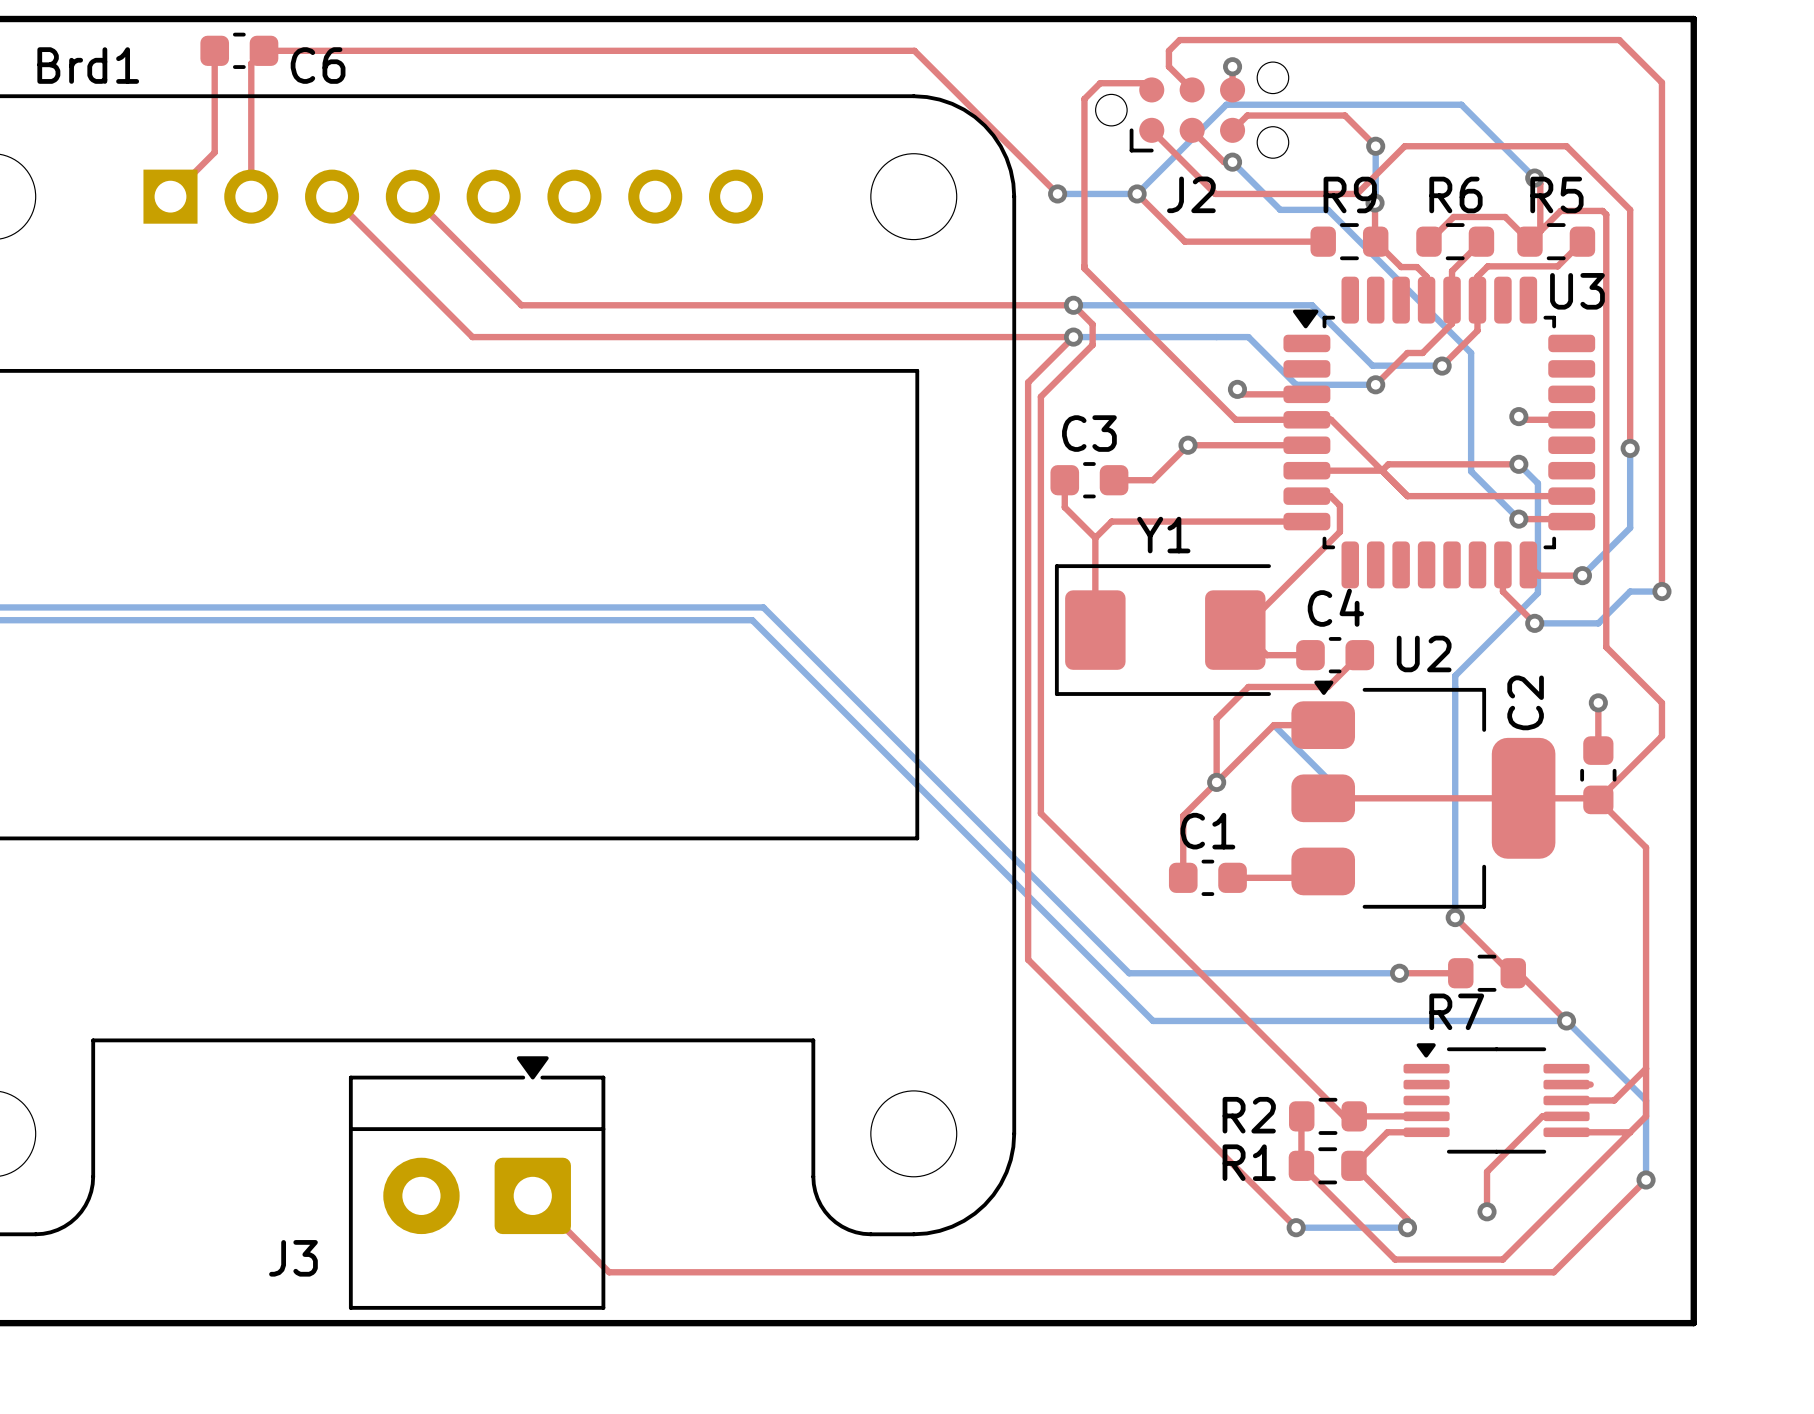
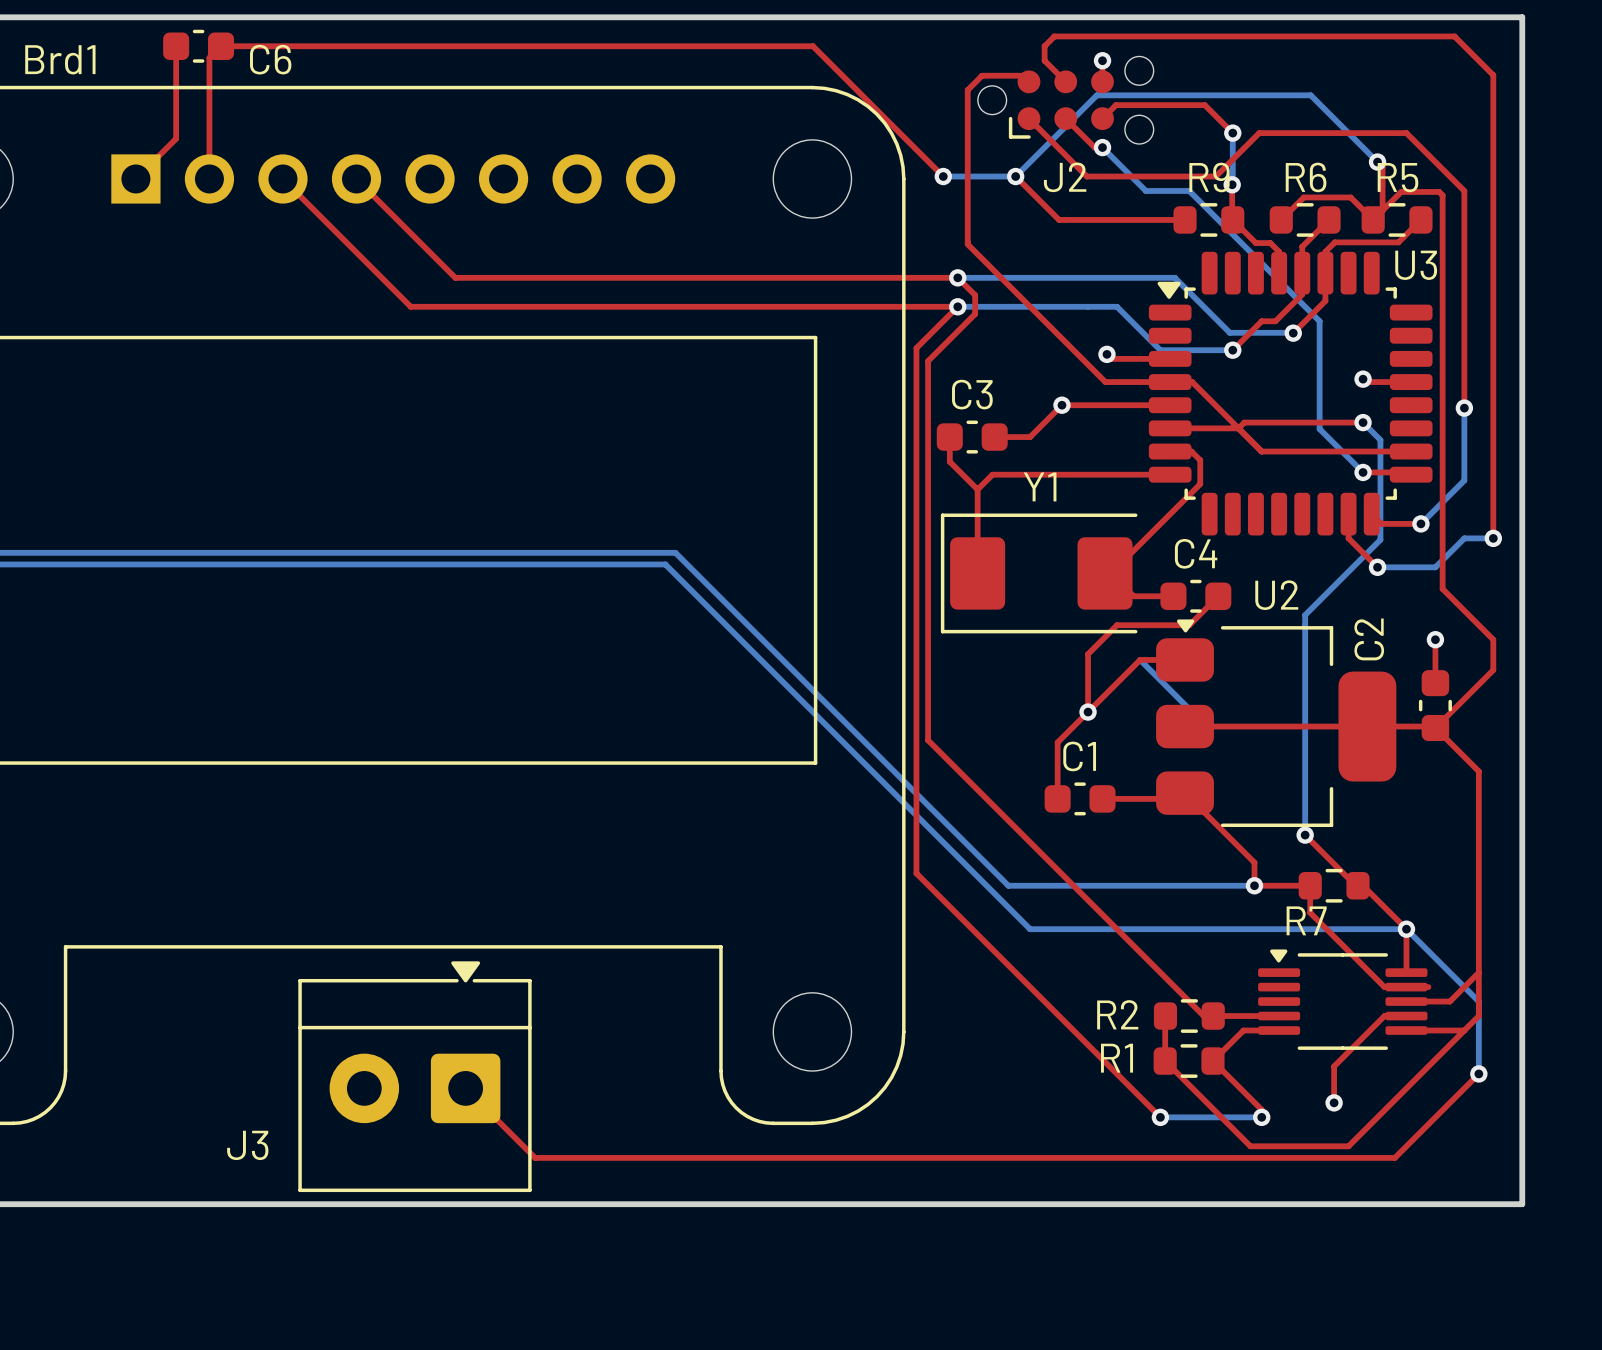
top track: none -> (1185, 793) (1254, 862) (1254, 885)
top track: none -> (1310, 885) (1310, 912) (1384, 987) (1406, 987)
top track: none -> (1406, 929) (1406, 972)

